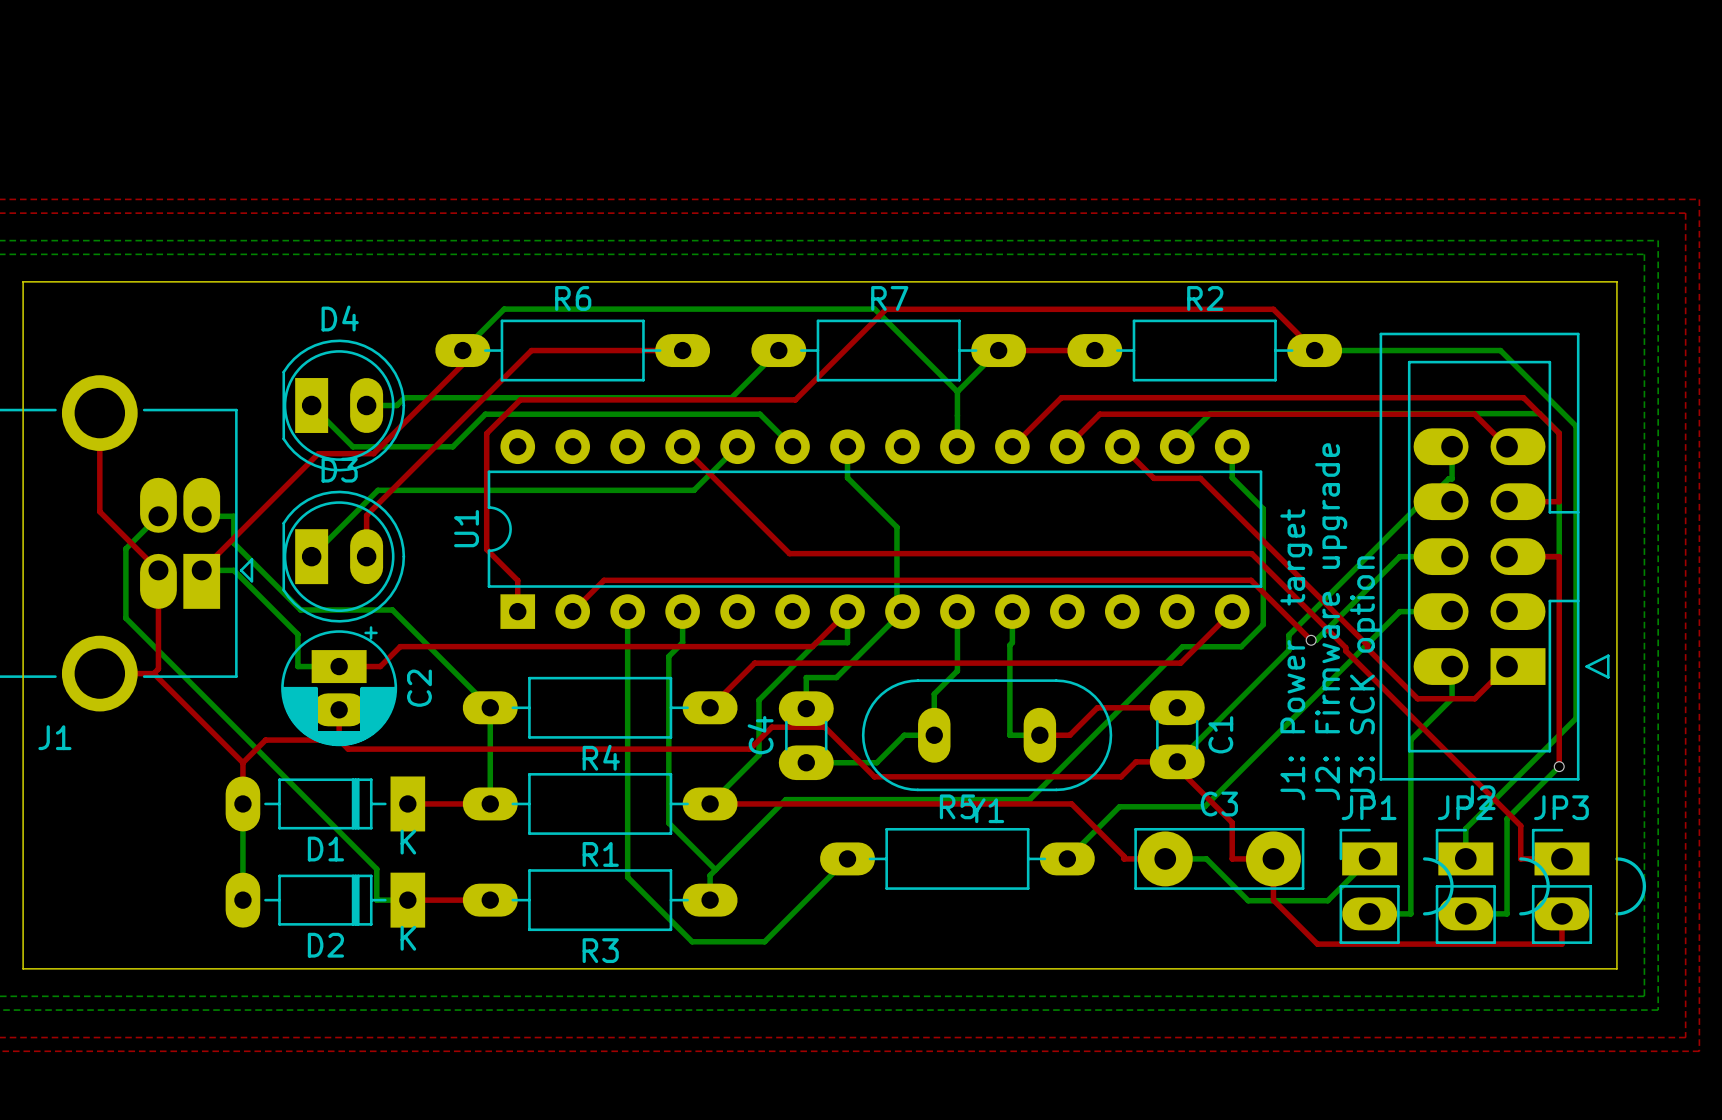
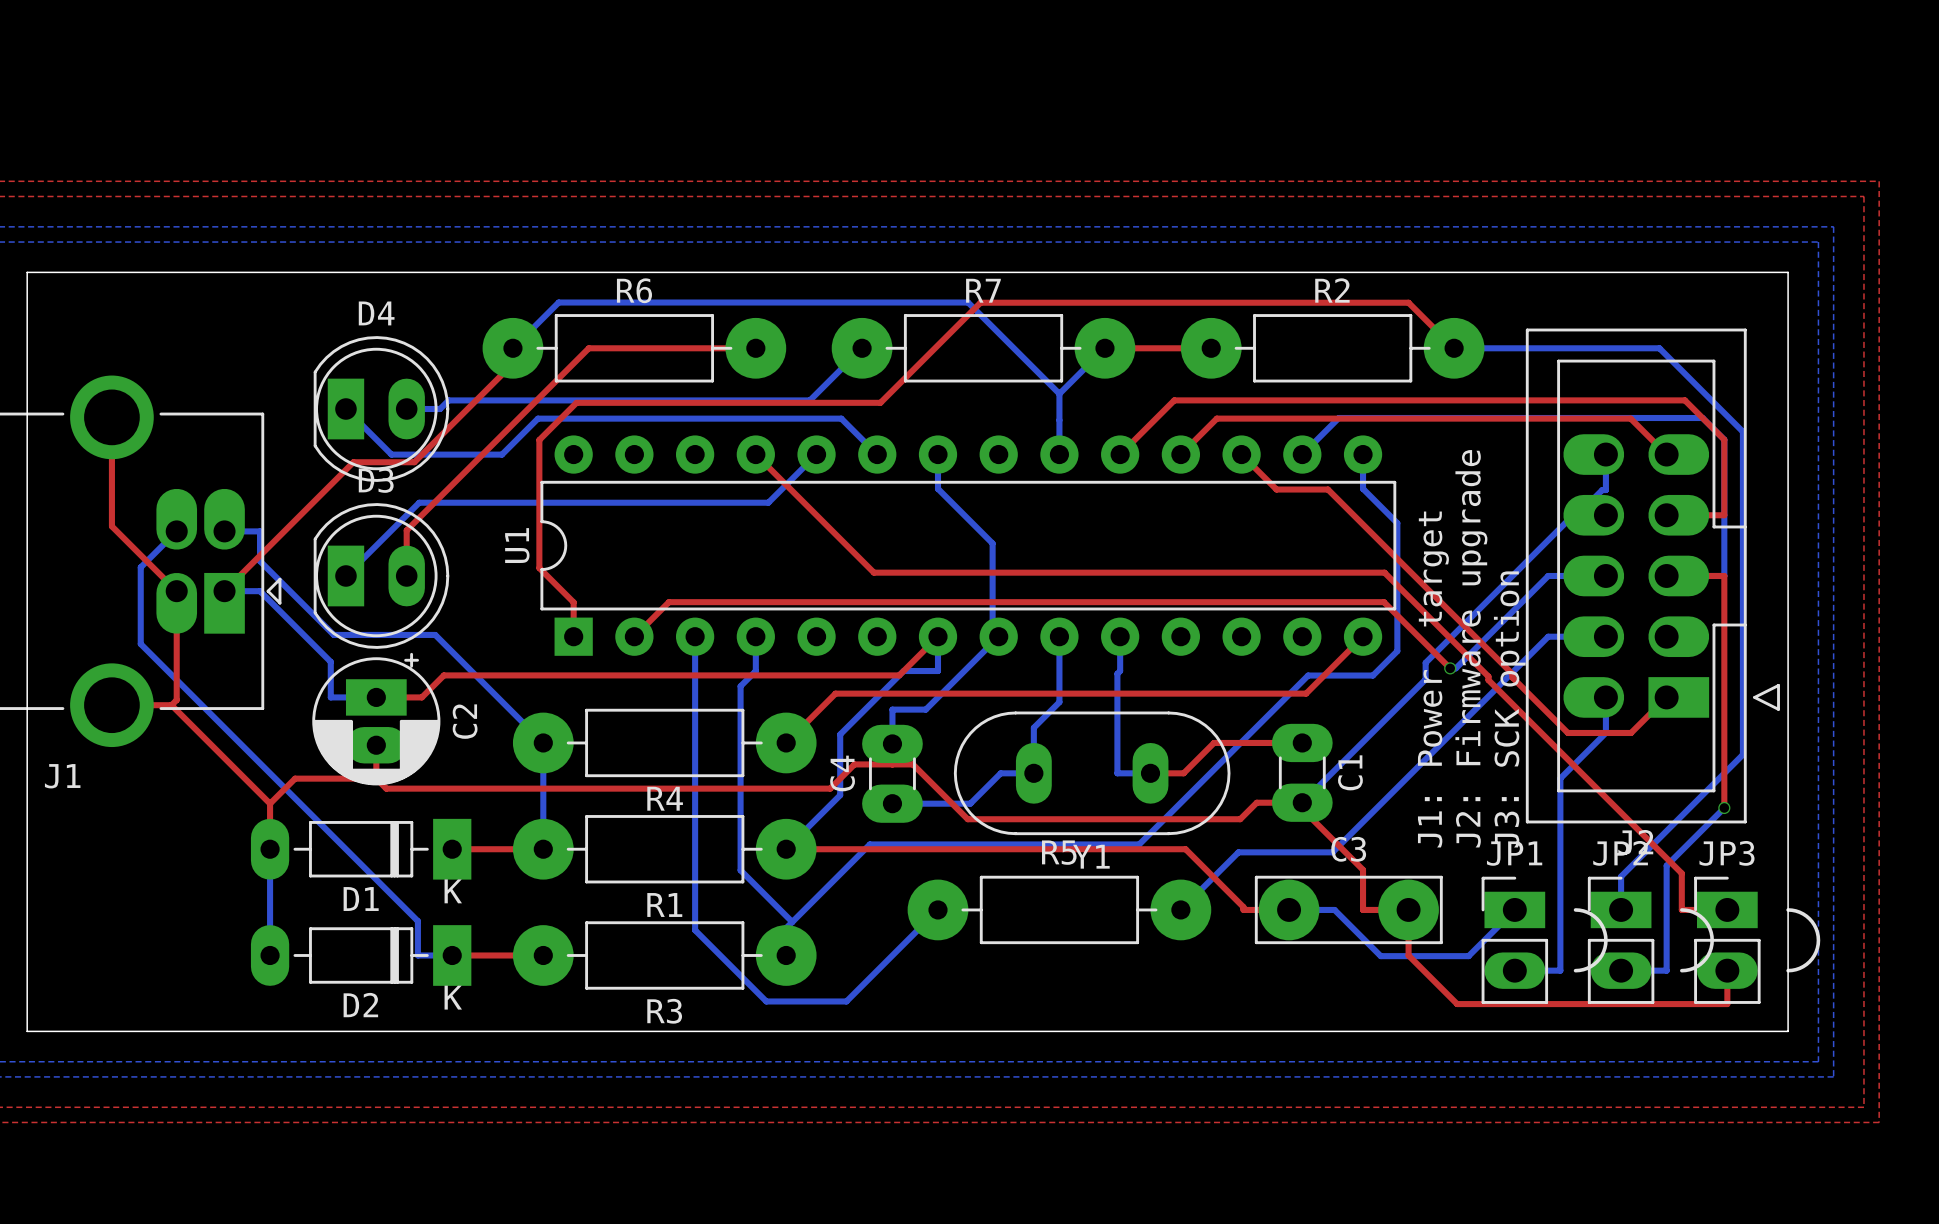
R6 footprint: [435, 319, 711, 382] -> [482, 314, 787, 383]
R7 footprint: [751, 319, 1027, 382] -> [831, 314, 1136, 383]
R2 footprint: [1067, 319, 1343, 382] -> [1180, 314, 1485, 383]
R4 footprint: [462, 676, 738, 739] -> [512, 708, 817, 778]
R1 footprint: [462, 773, 738, 835] -> [512, 815, 817, 884]
R5 footprint: [820, 827, 1095, 890] -> [907, 875, 1212, 945]
R3 footprint: [462, 869, 738, 932] -> [512, 921, 817, 990]

